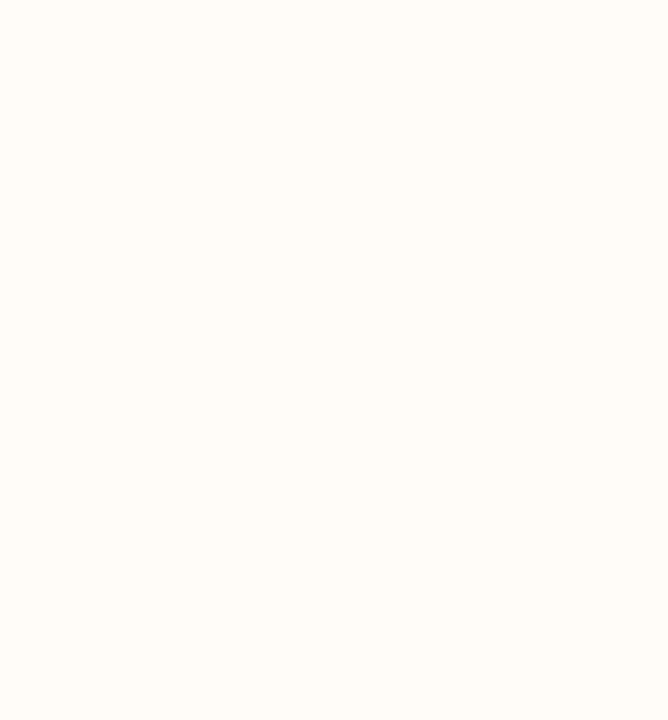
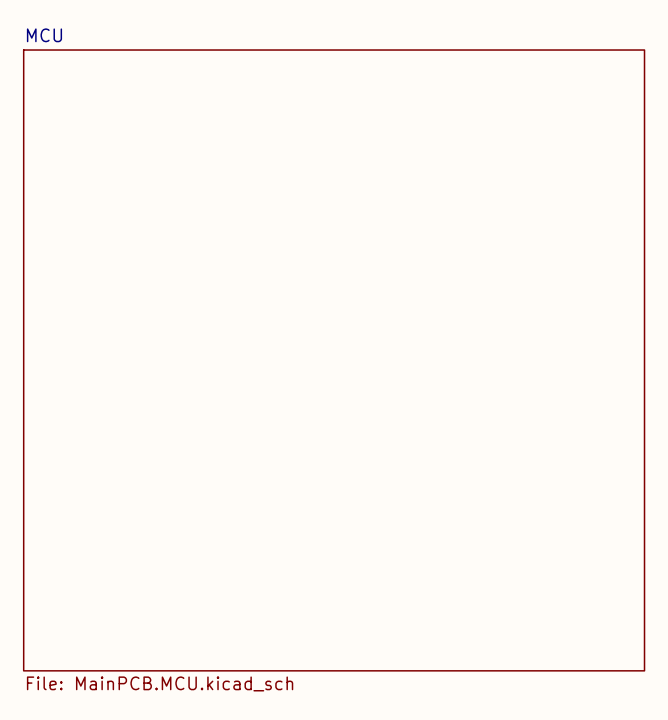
sheet MCU: none -> File: MainPCB.MCU.kicad_sch (334, 360)

